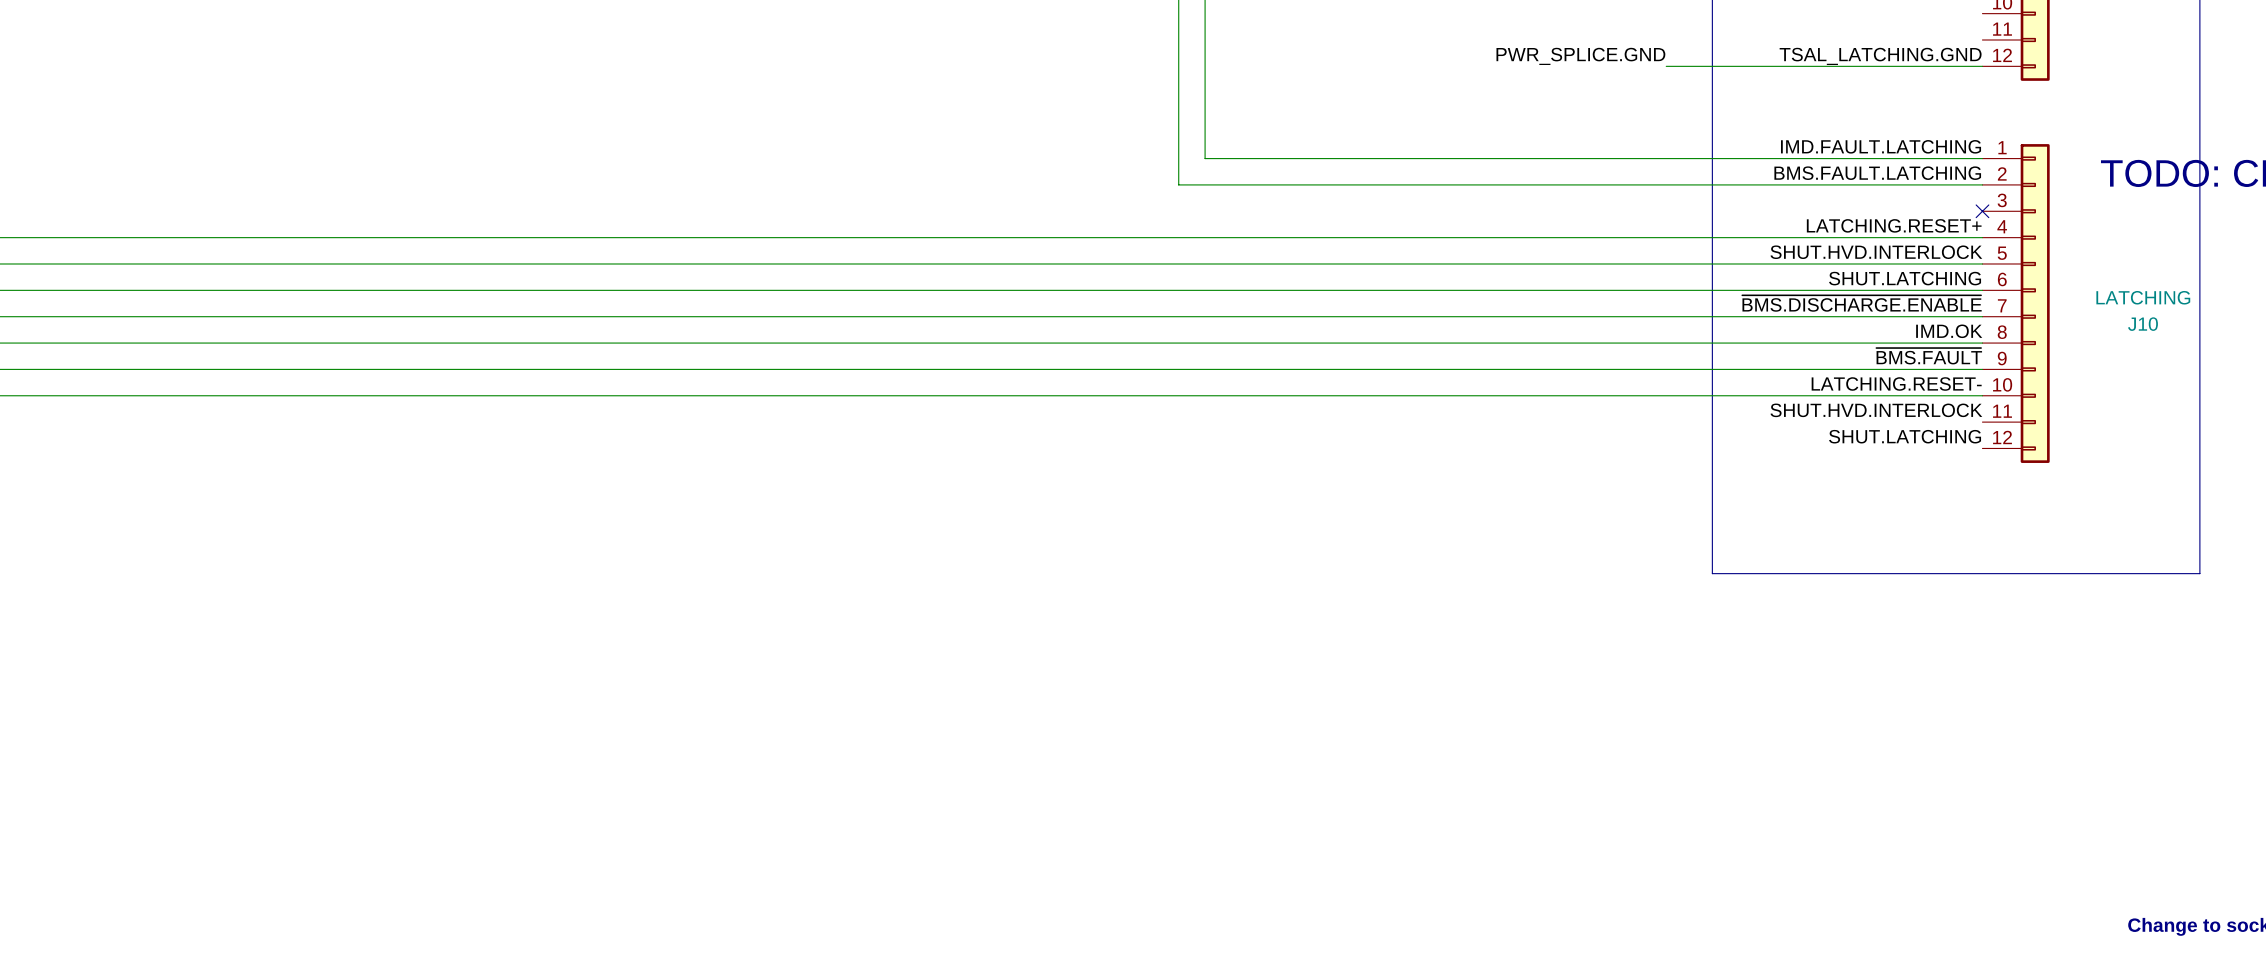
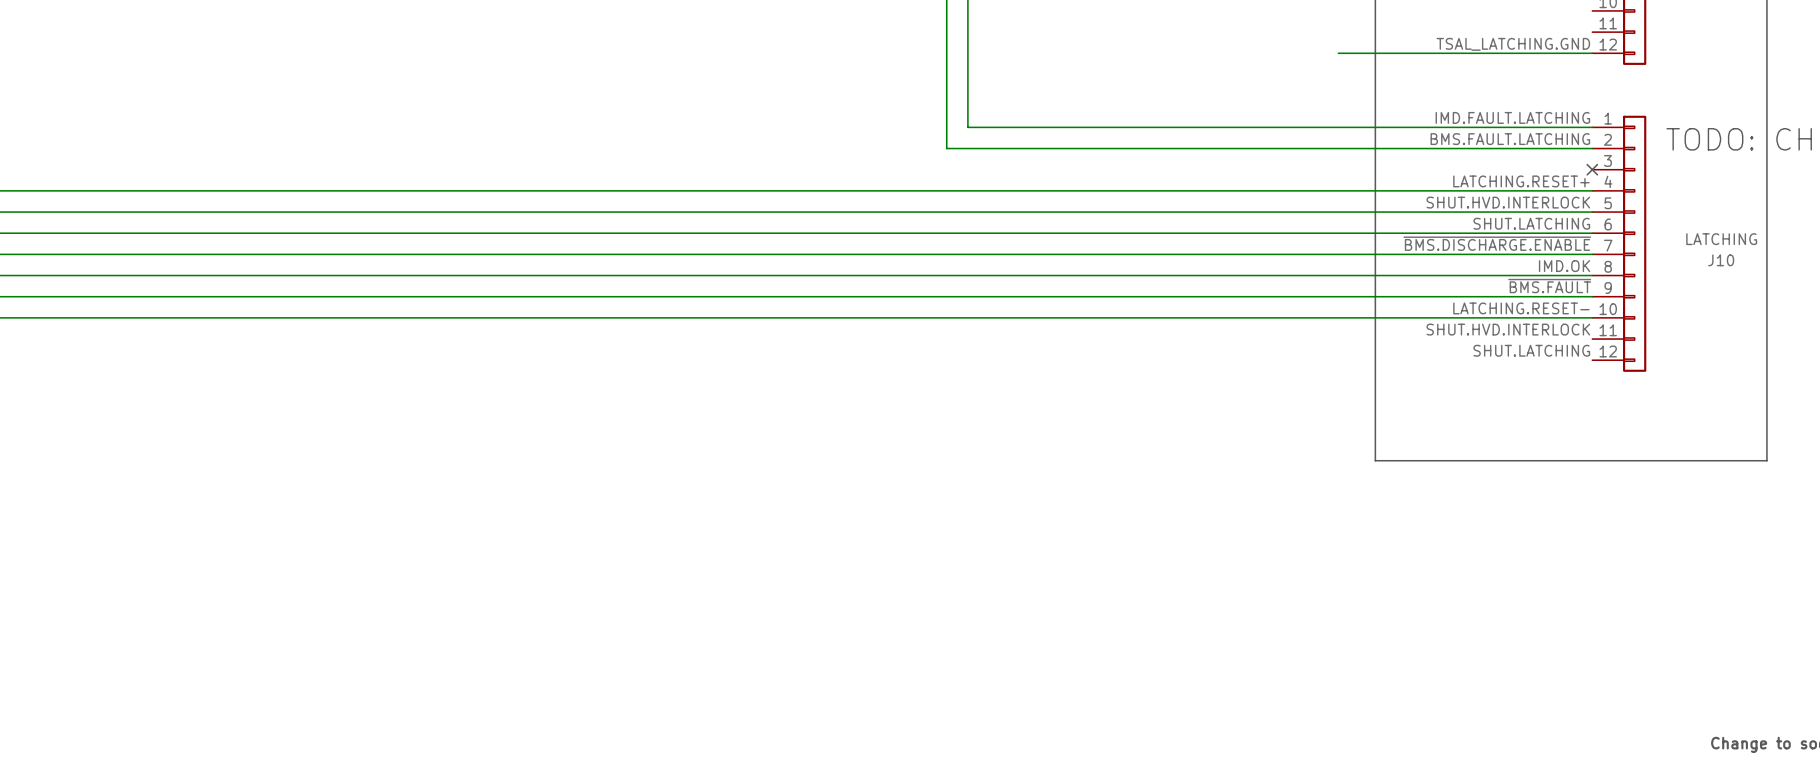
label: PWR_SPLICE.GND (1580, 56) -> none

